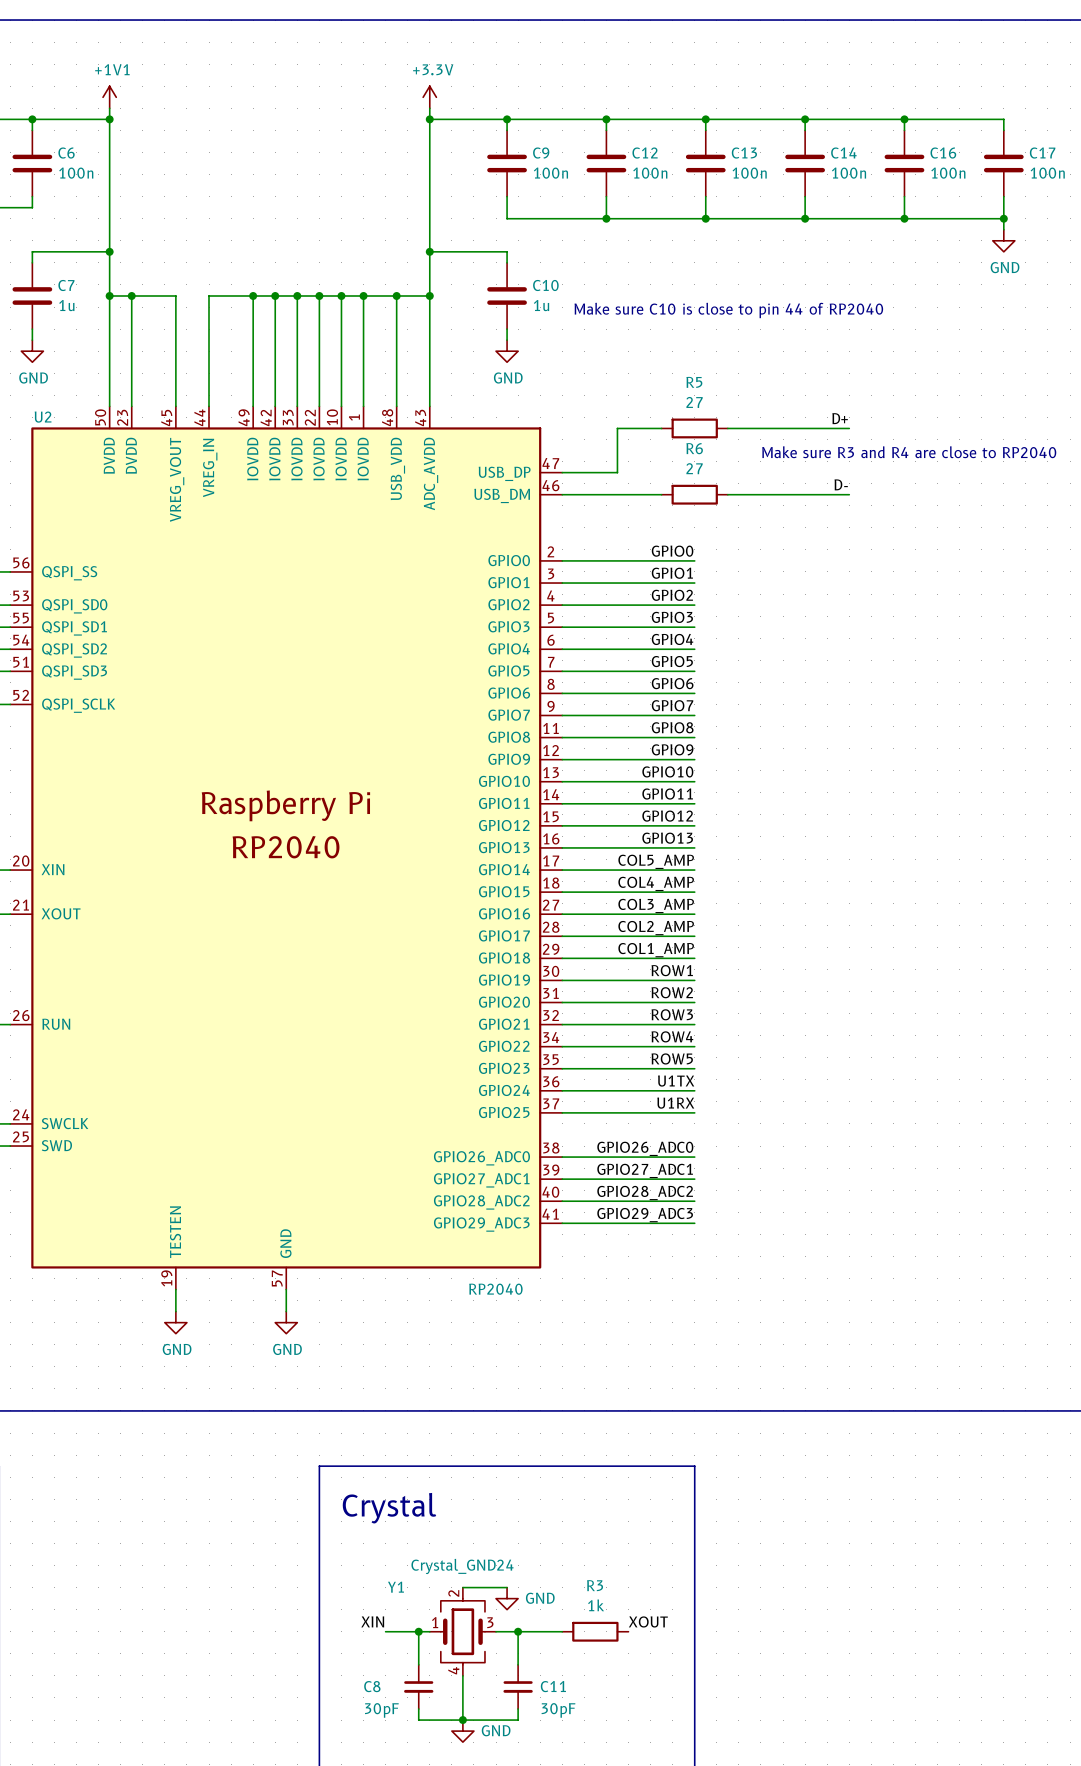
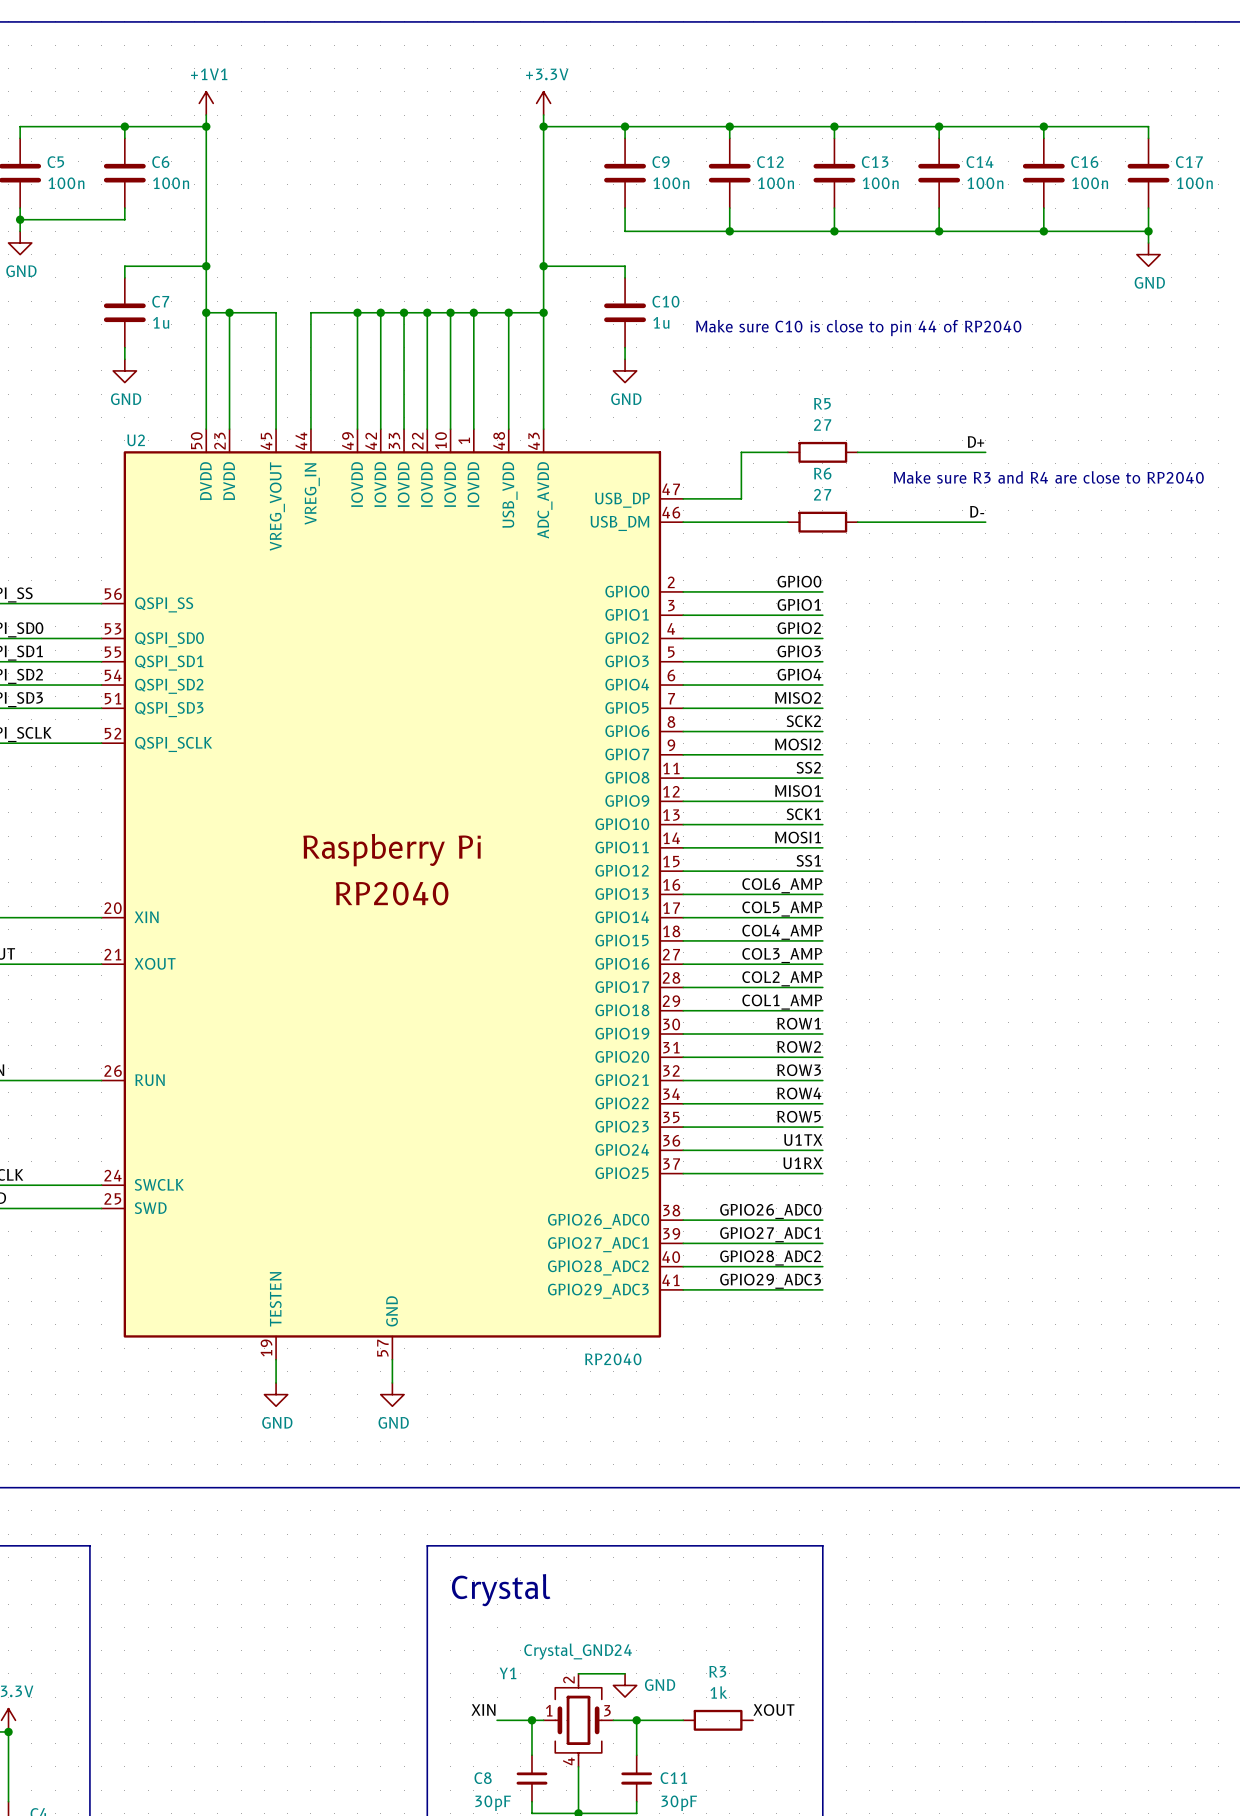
label: GPIO5 (672, 661) -> MISO2 (798, 697)
label: GPIO6 (672, 683) -> SCK2 (803, 721)
label: GPIO7 (672, 705) -> MOSI2 (798, 744)
label: GPIO8 (672, 727) -> SS2 (808, 767)
label: GPIO9 (672, 749) -> MISO1 (798, 791)
label: GPIO10 (667, 771) -> SCK1 (803, 814)
label: GPIO11 (667, 794) -> MOSI1 (798, 837)
label: GPIO12 (667, 816) -> SS1 (808, 860)
label: GPIO13 (667, 838) -> COL6_AMP (782, 885)

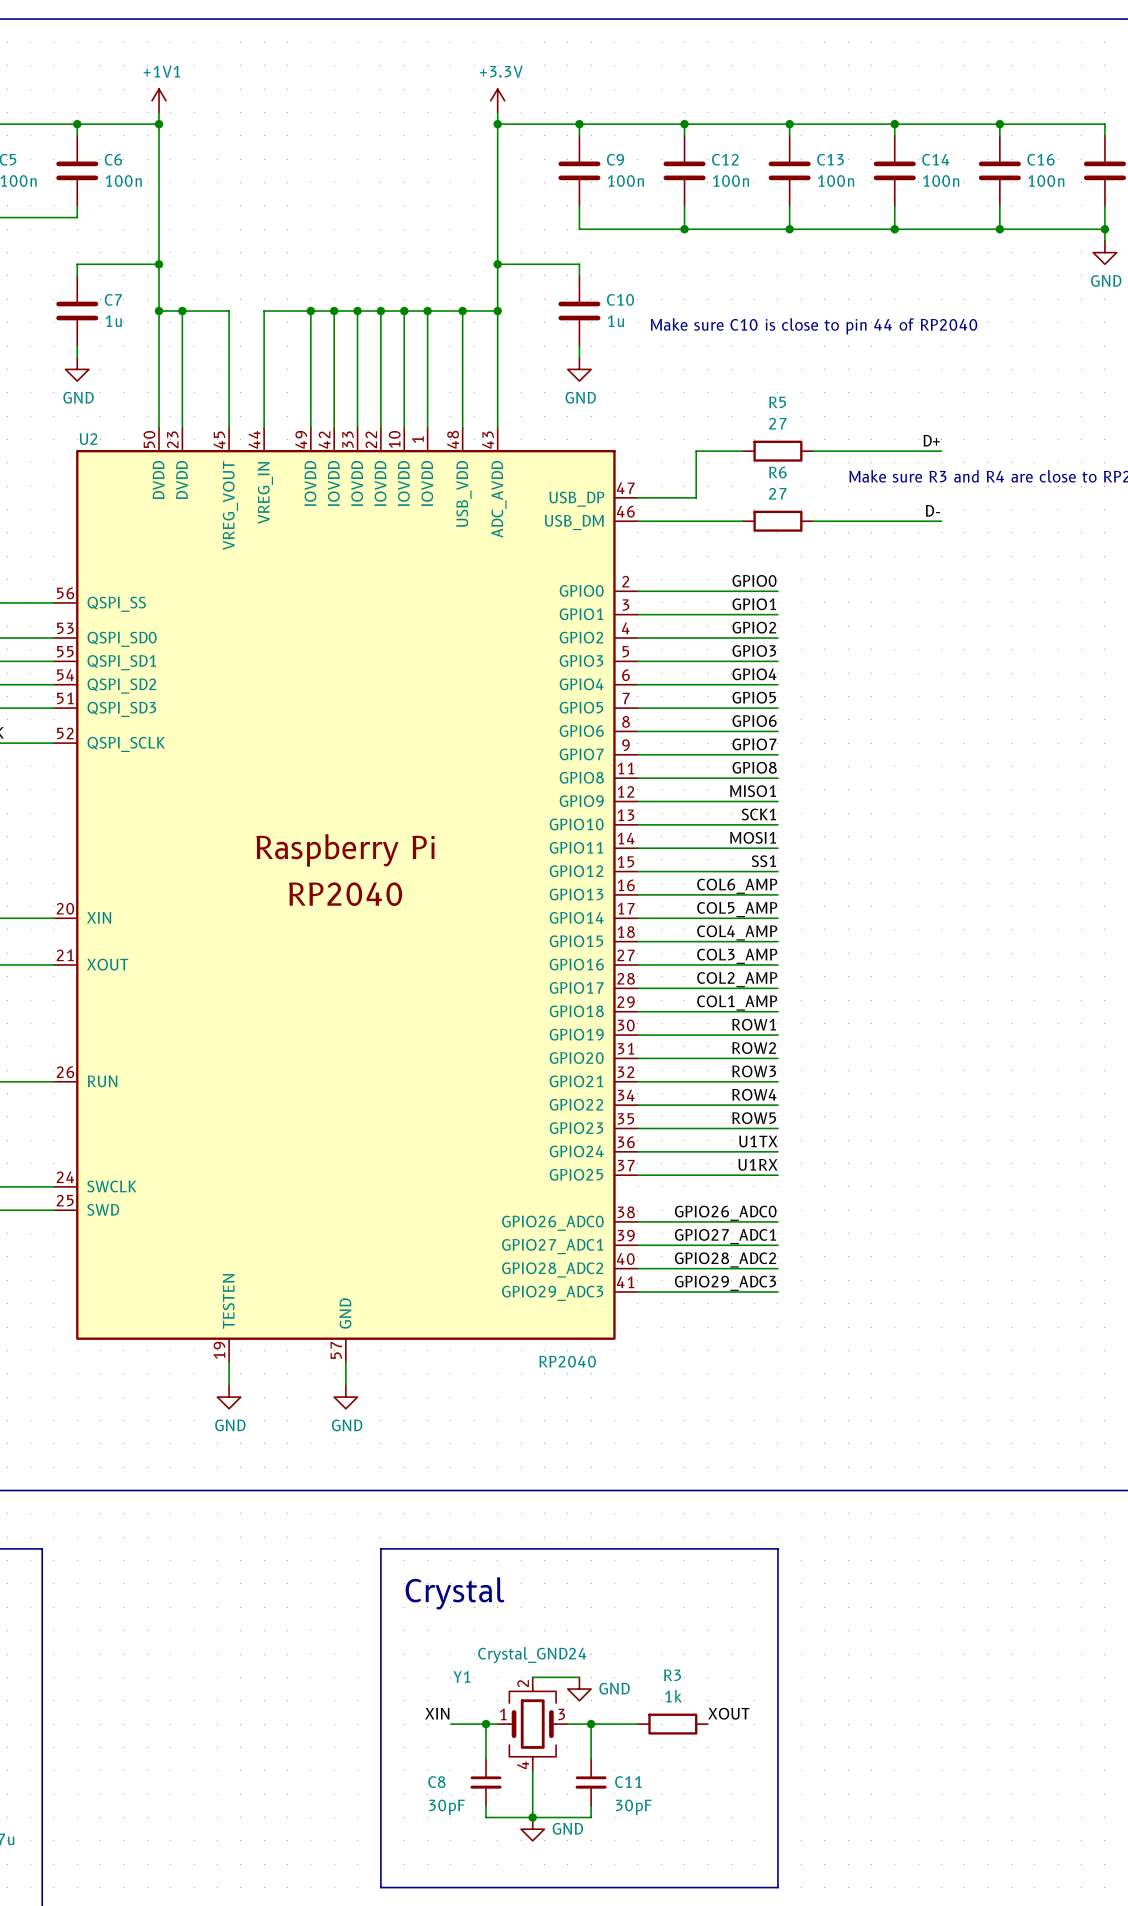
label: MISO2 (798, 697) -> GPIO5 (754, 697)
label: SCK2 (803, 721) -> GPIO6 (754, 721)
label: MOSI2 (798, 744) -> GPIO7 (754, 744)
label: SS2 (808, 767) -> GPIO8 (754, 767)

